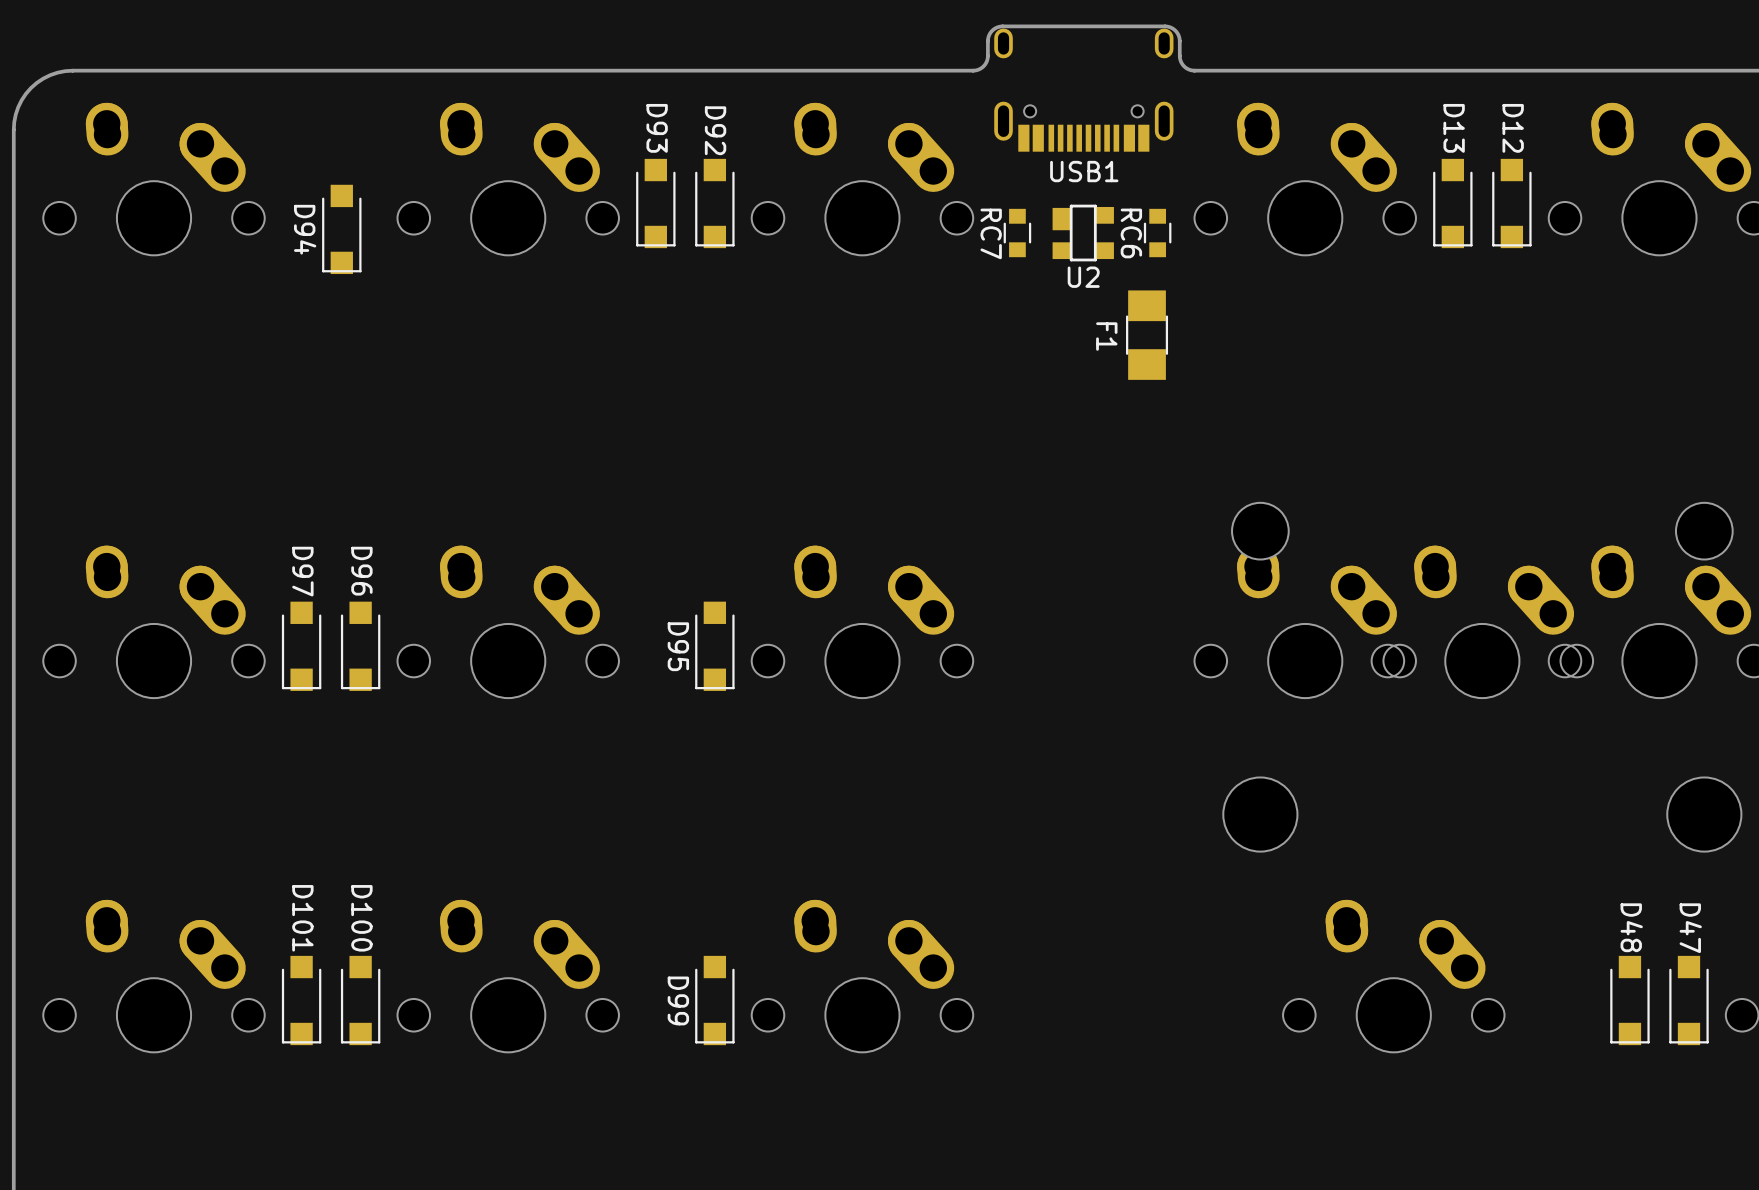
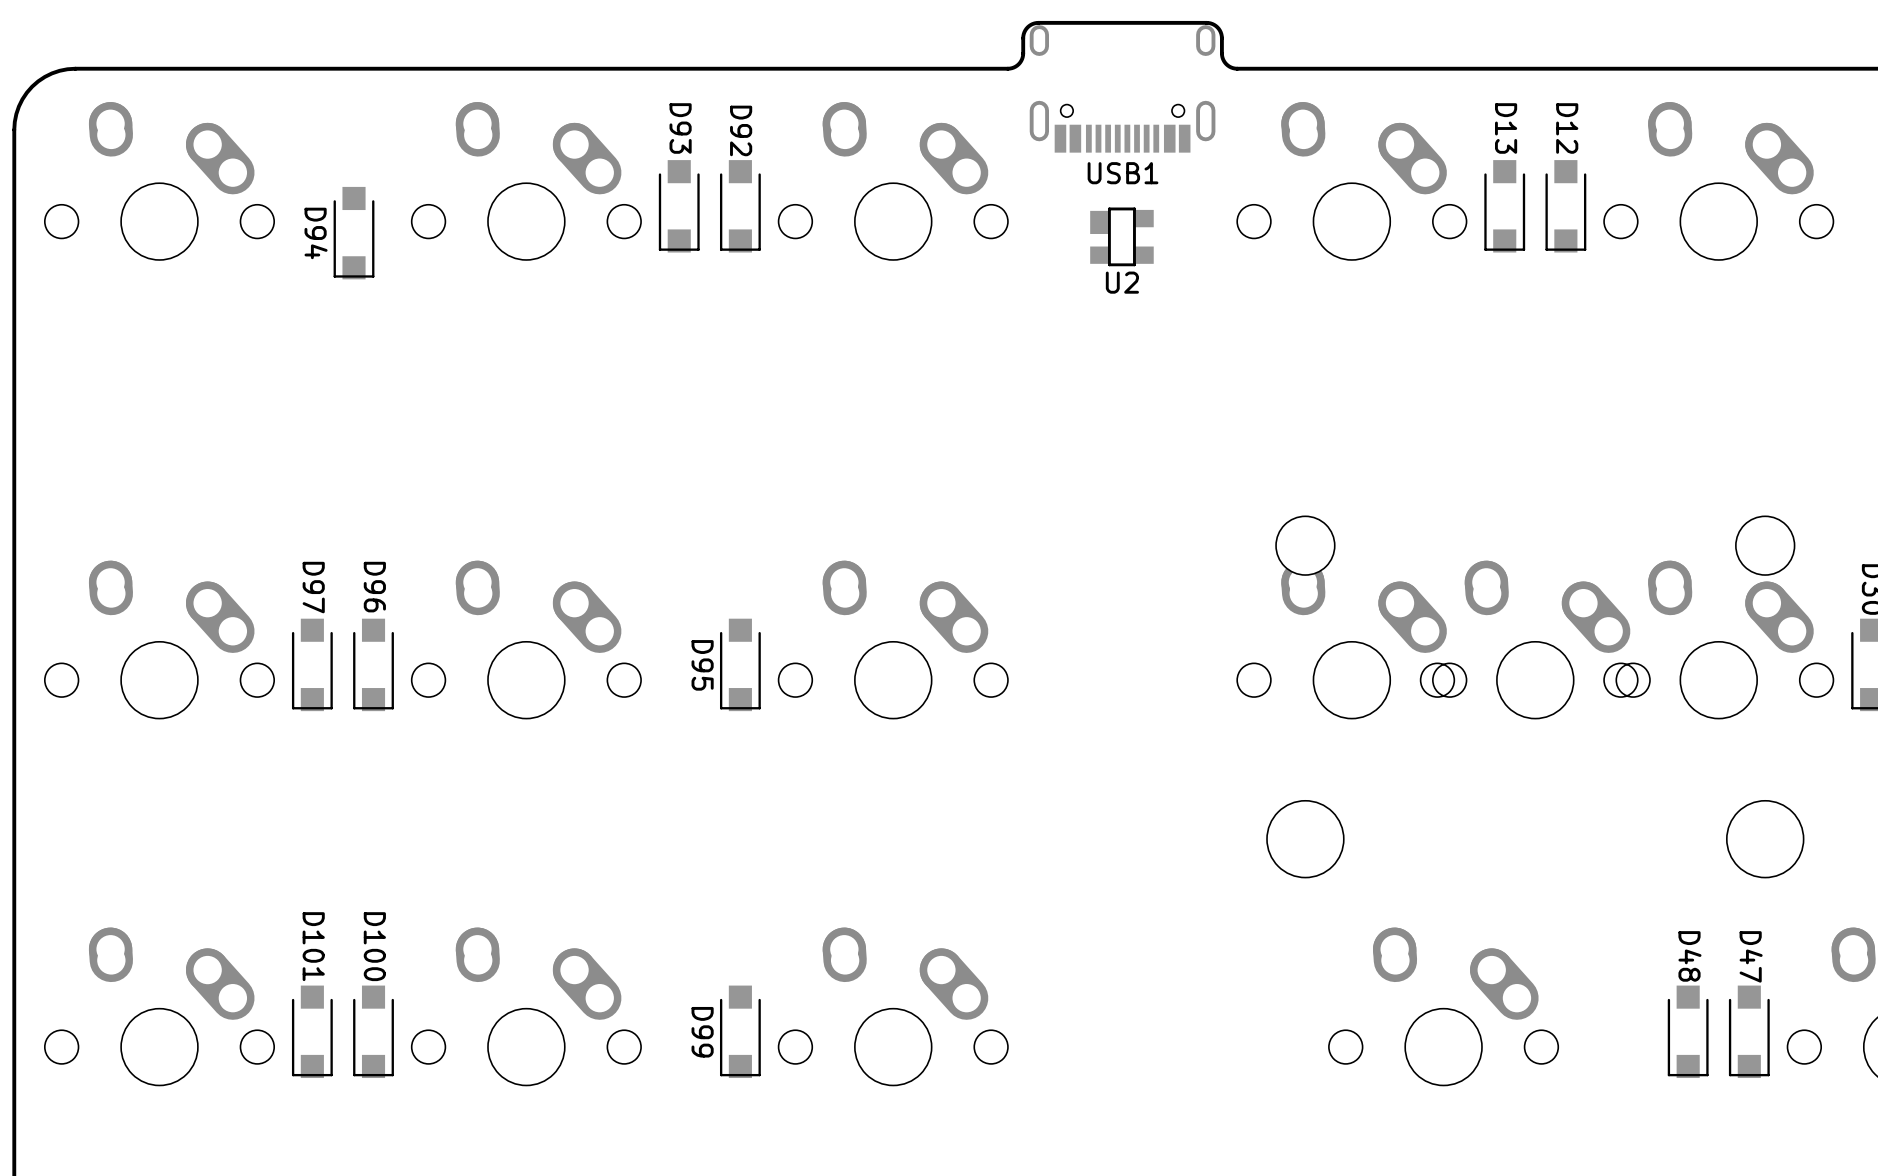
RC7: (1017, 233) -> none
RC6: (1157, 233) -> none
F1: (1147, 335) -> none

